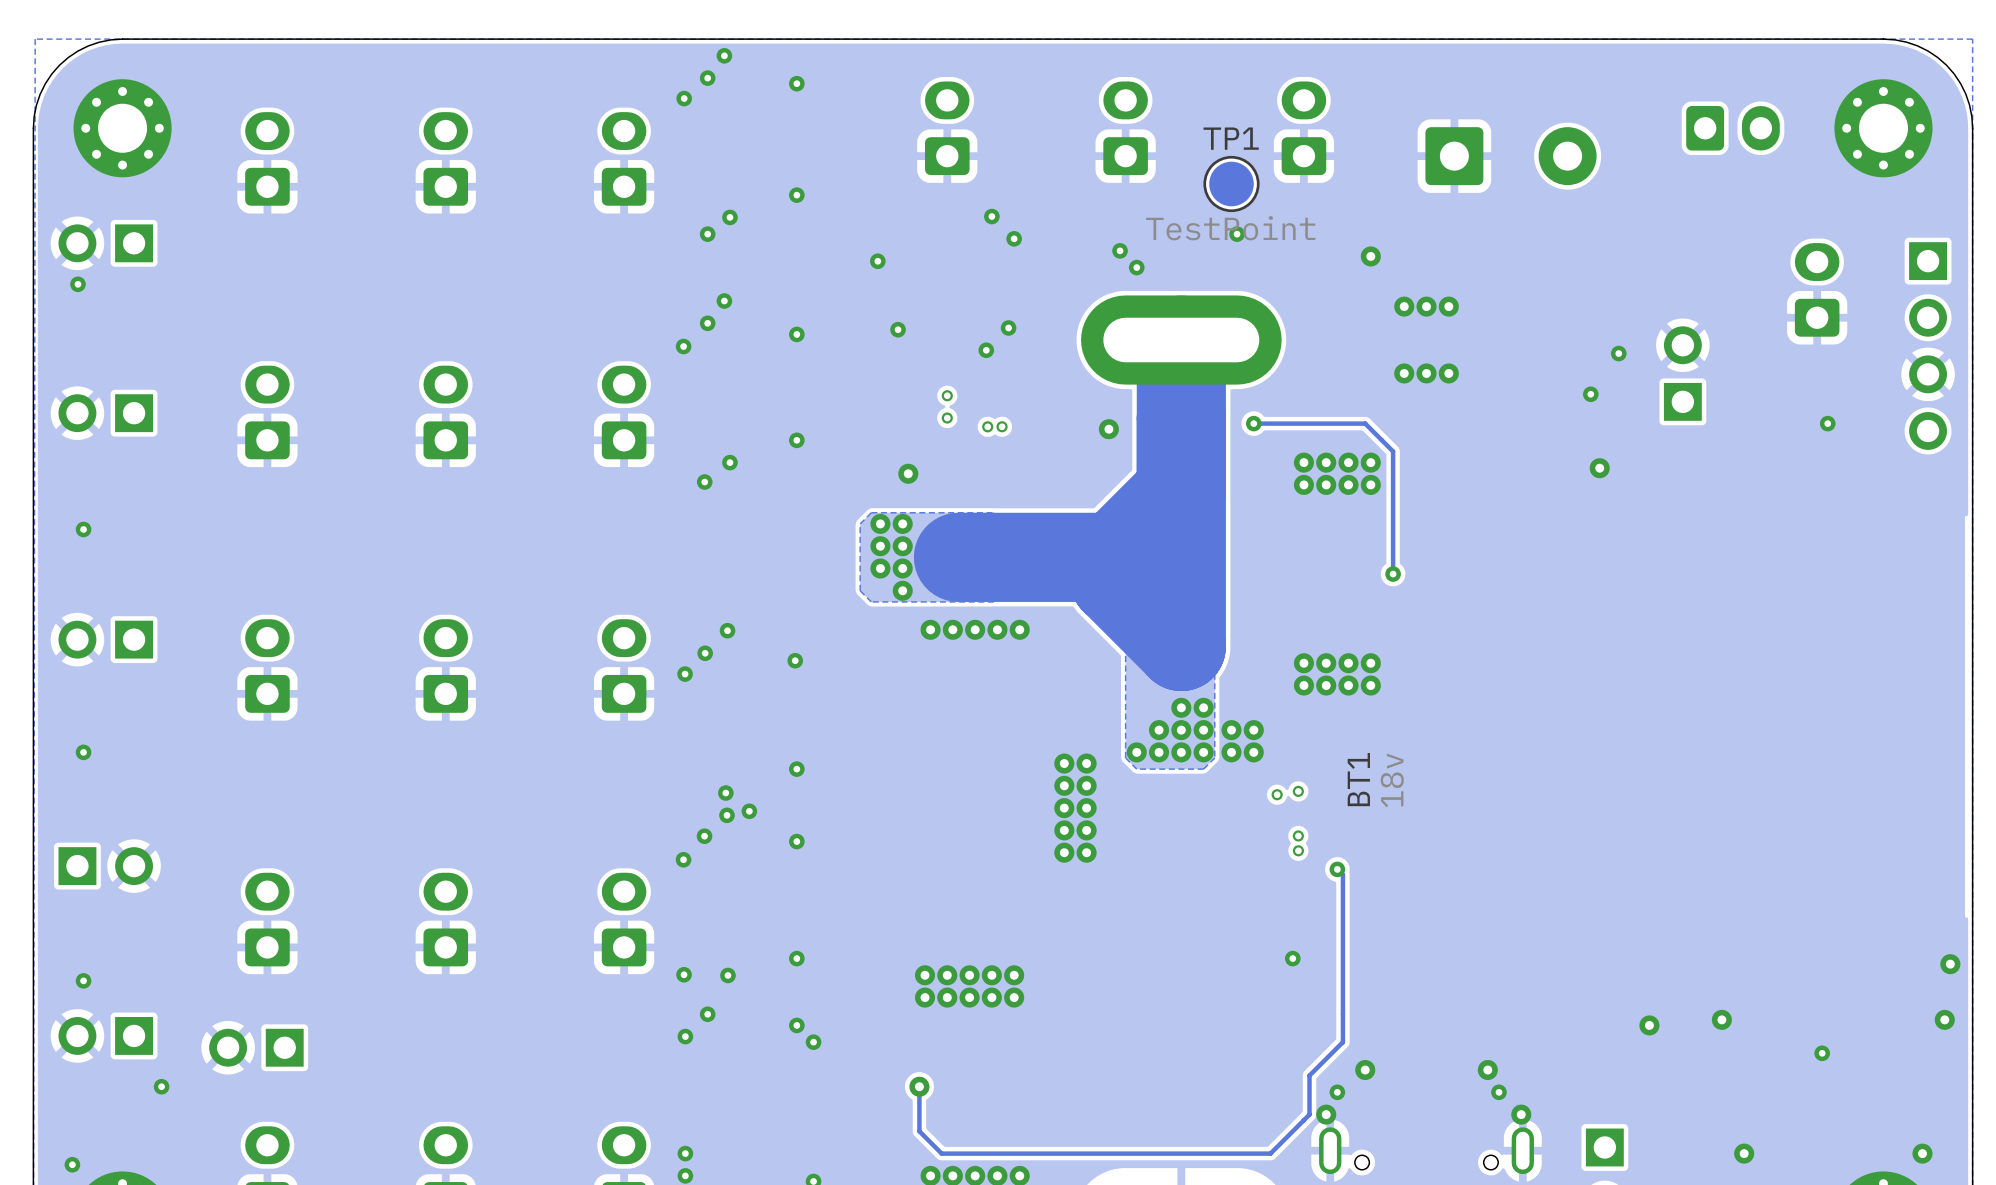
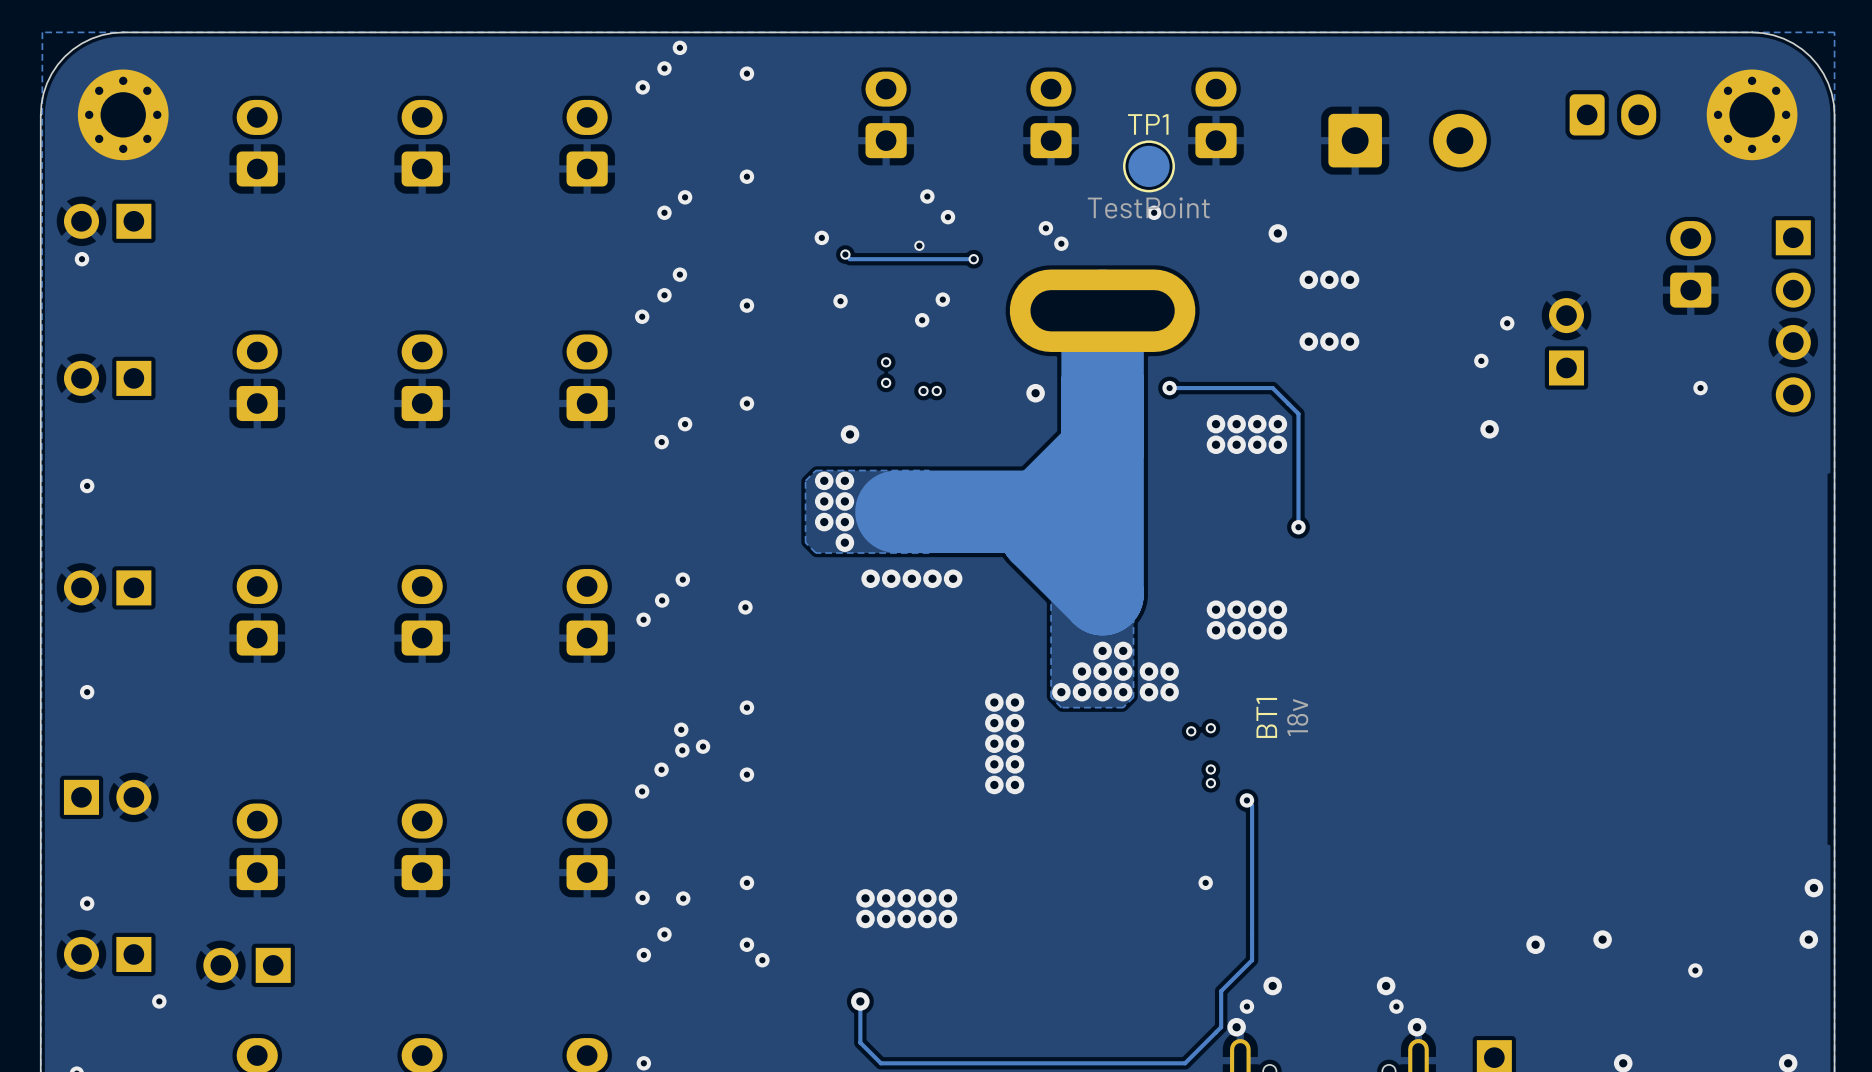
via: none -> (919, 245)
track: none -> (845, 254) (850, 259) (973, 259)
via: none -> (845, 254)
via: none -> (973, 259)

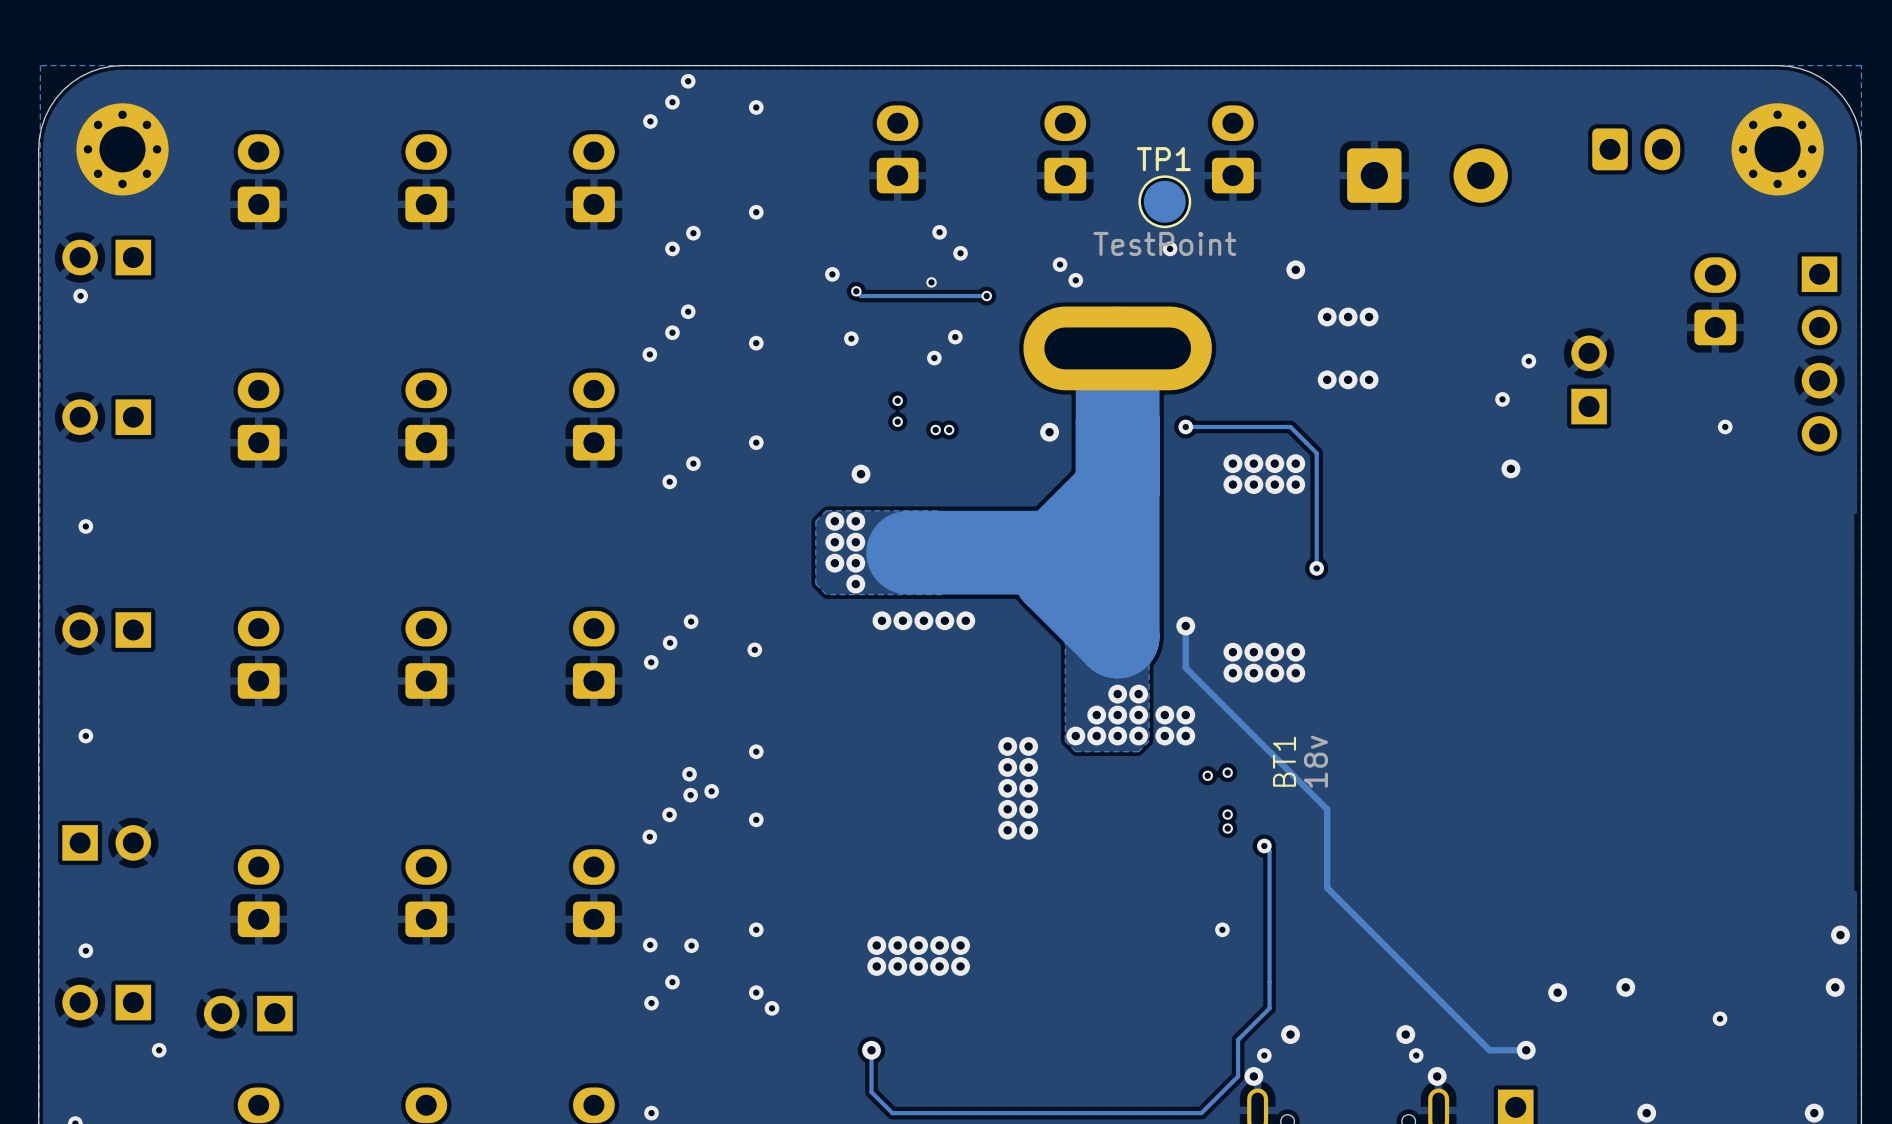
track: none -> (1185, 626) (1185, 667) (1327, 809) (1327, 887) (1489, 1050) (1526, 1050)
via: none -> (1185, 626)
via: none -> (1526, 1050)

